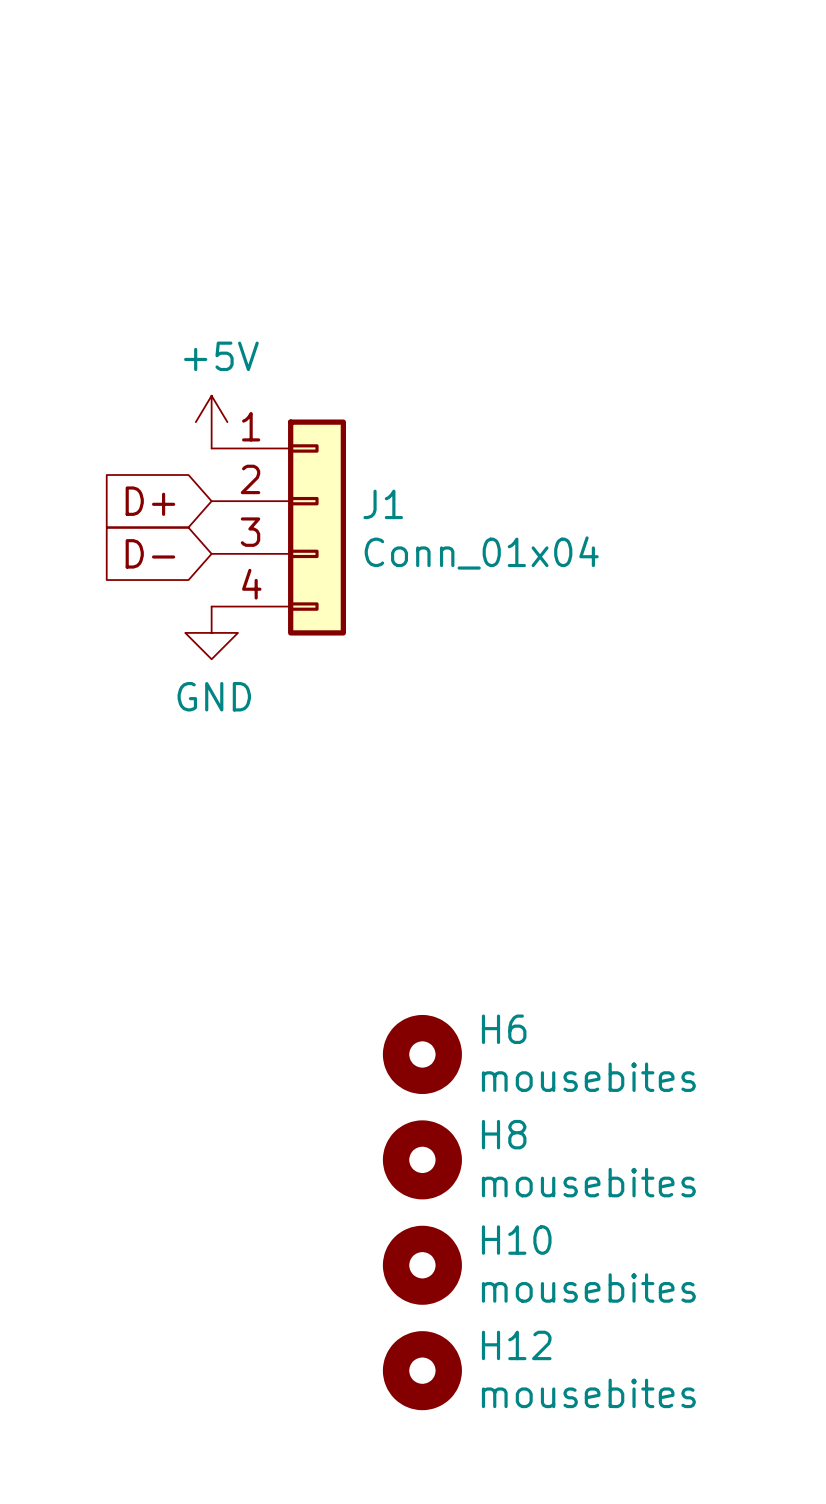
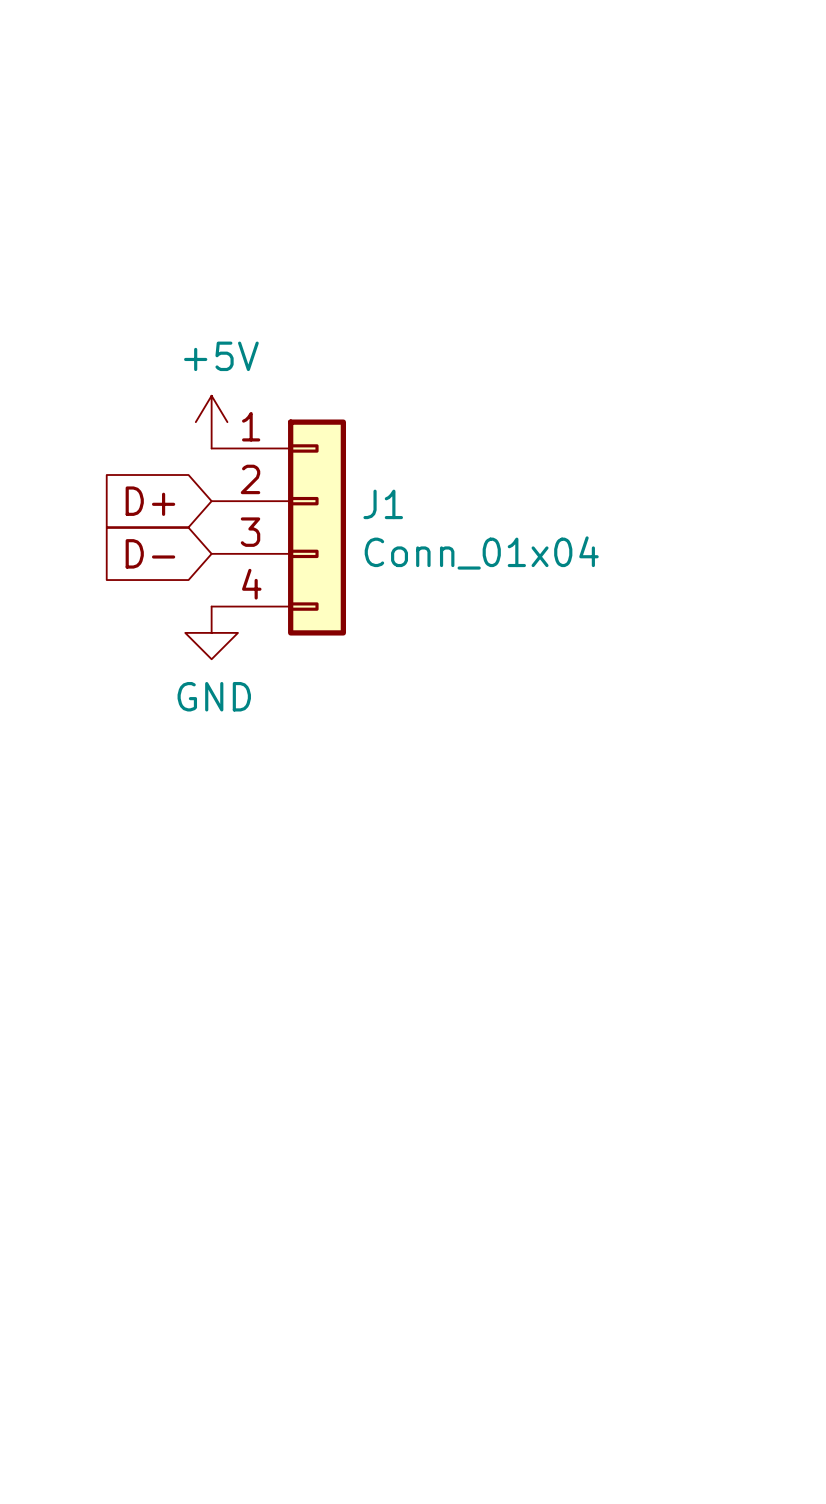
H6: mousebites (422, 1054) -> none
H8: mousebites (422, 1159) -> none
H10: mousebites (422, 1265) -> none
H12: mousebites (422, 1370) -> none

